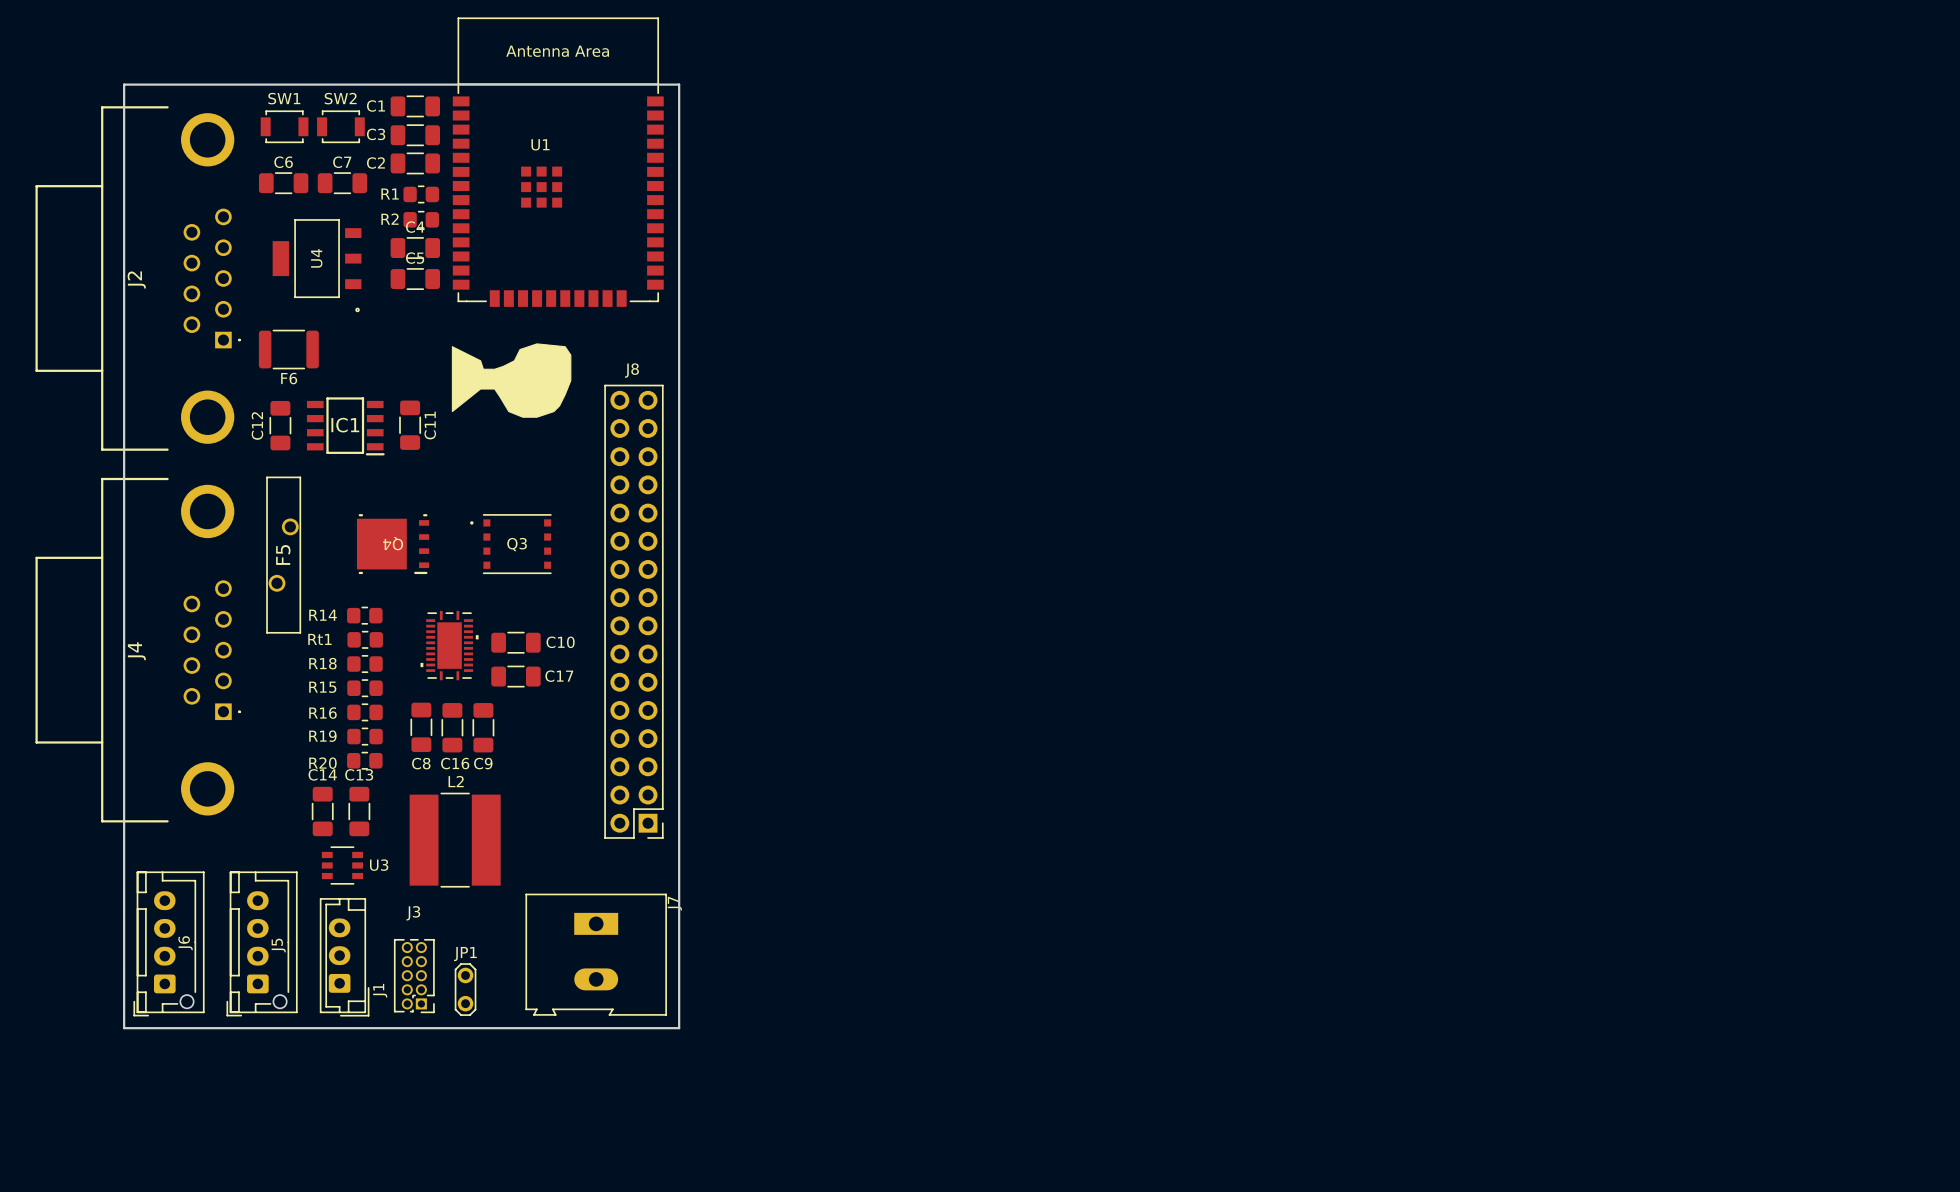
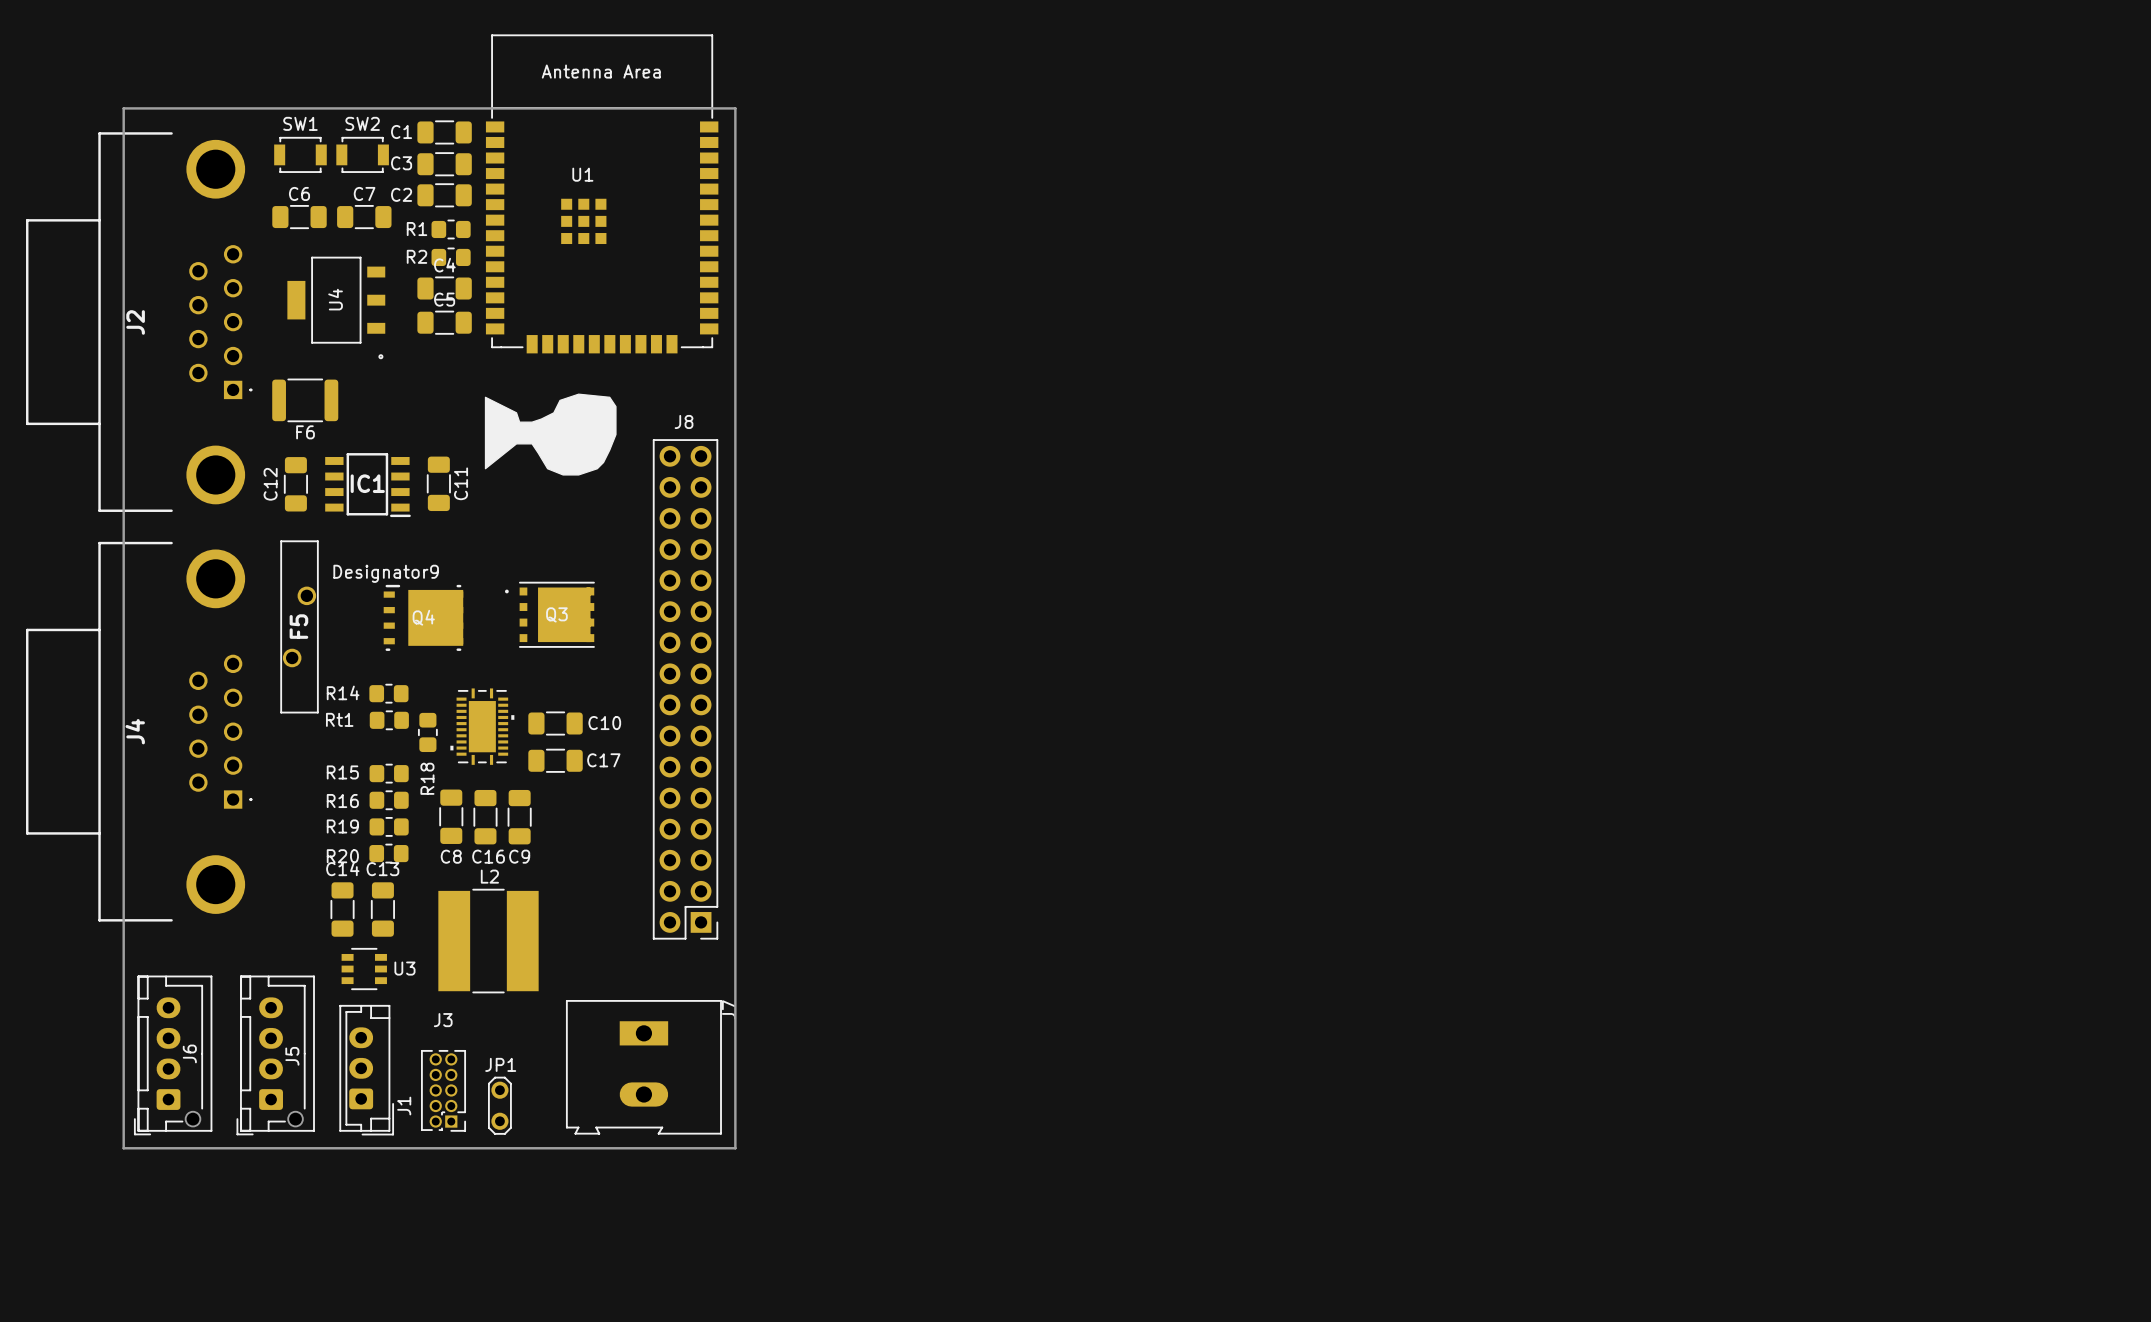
Q4 footprint: [356, 514, 430, 575] -> [383, 584, 464, 651]
Q3 footprint: [470, 514, 552, 575] -> [505, 581, 595, 648]
R18 name position: R18 (322, 663) -> R18 (427, 778)
R18 rotation: 0° (364, 664) -> 90° clockwise (427, 732)
R18 position: (364, 664) -> (427, 732)

